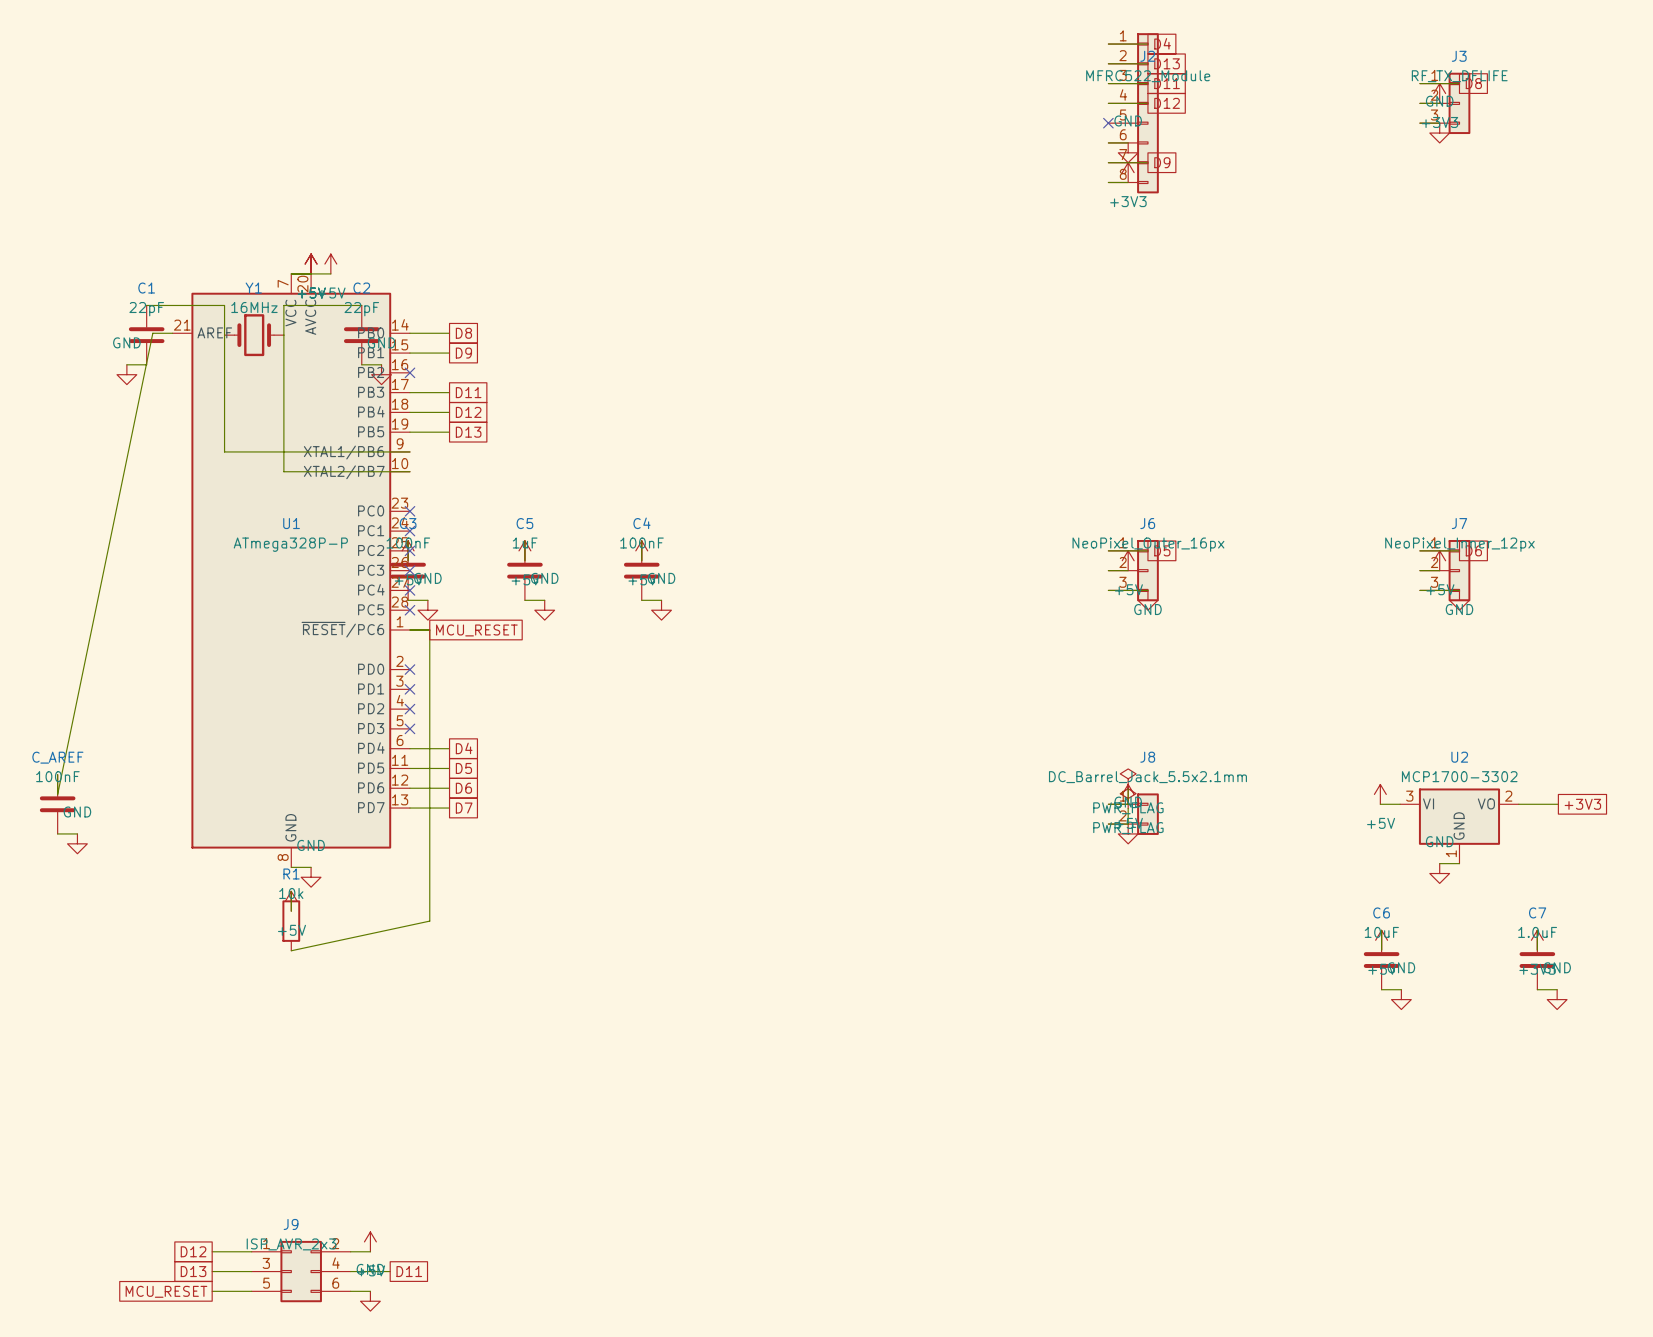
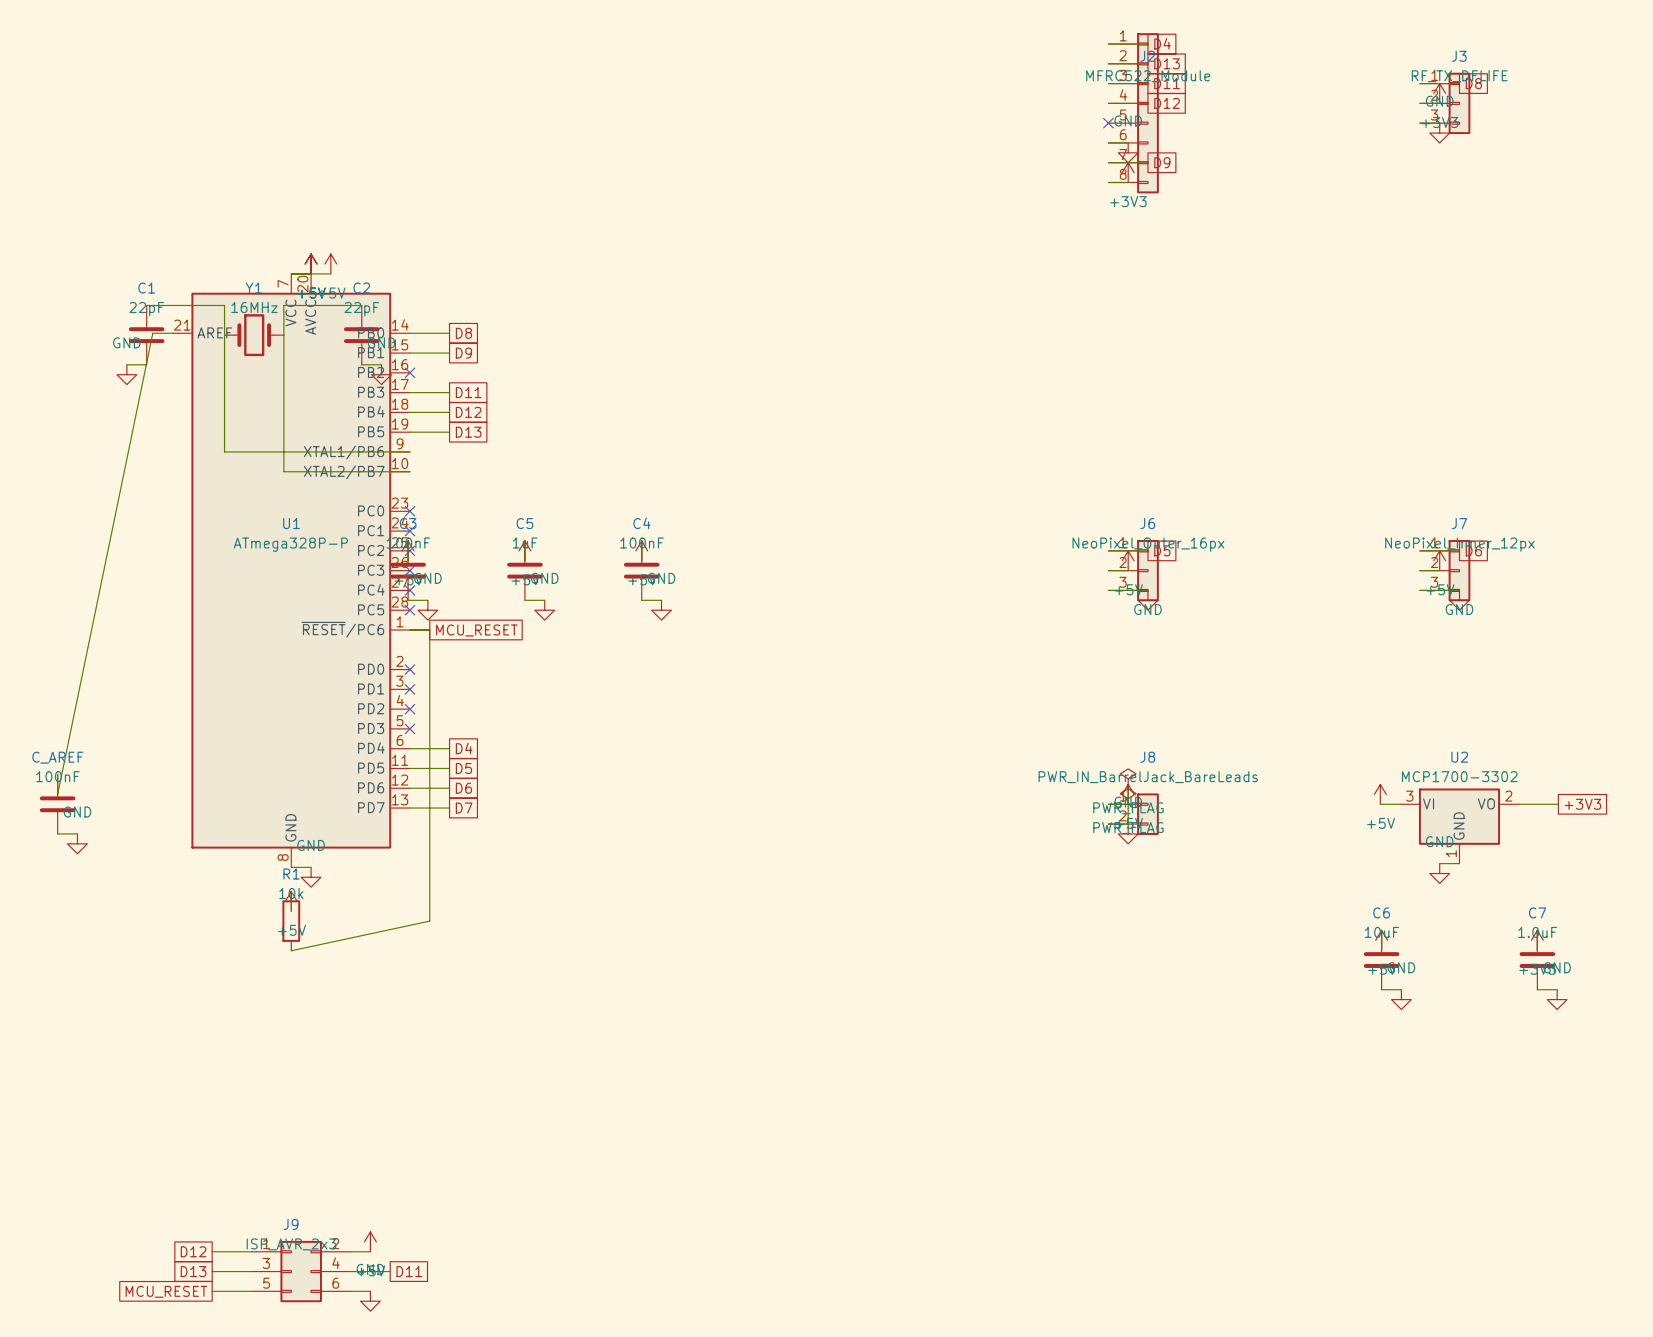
J8 value: DC_Barrel_Jack_5.5x2.1mm (1147, 777) -> PWR_IN_BarrelJack_BareLeads (1148, 777)

